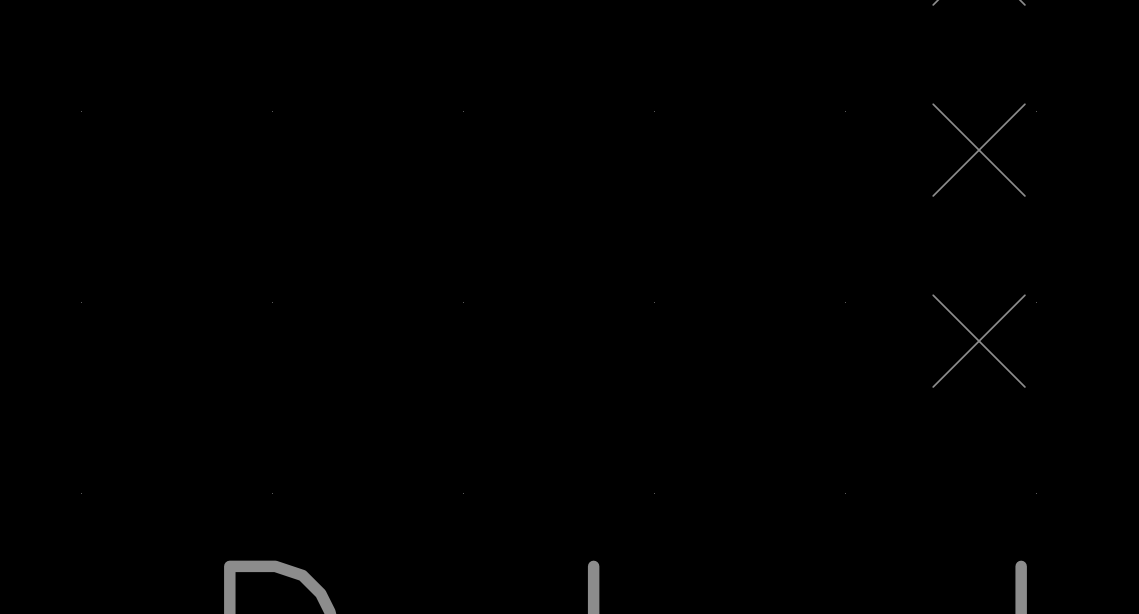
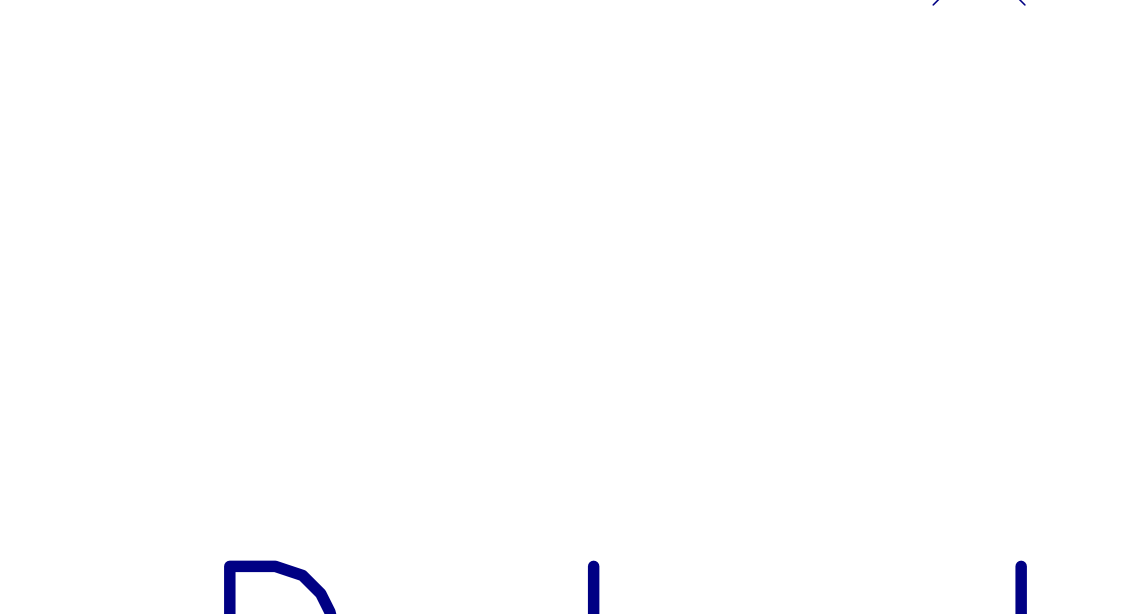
no-connect mark: (979, 150) -> none
no-connect mark: (979, 341) -> none

